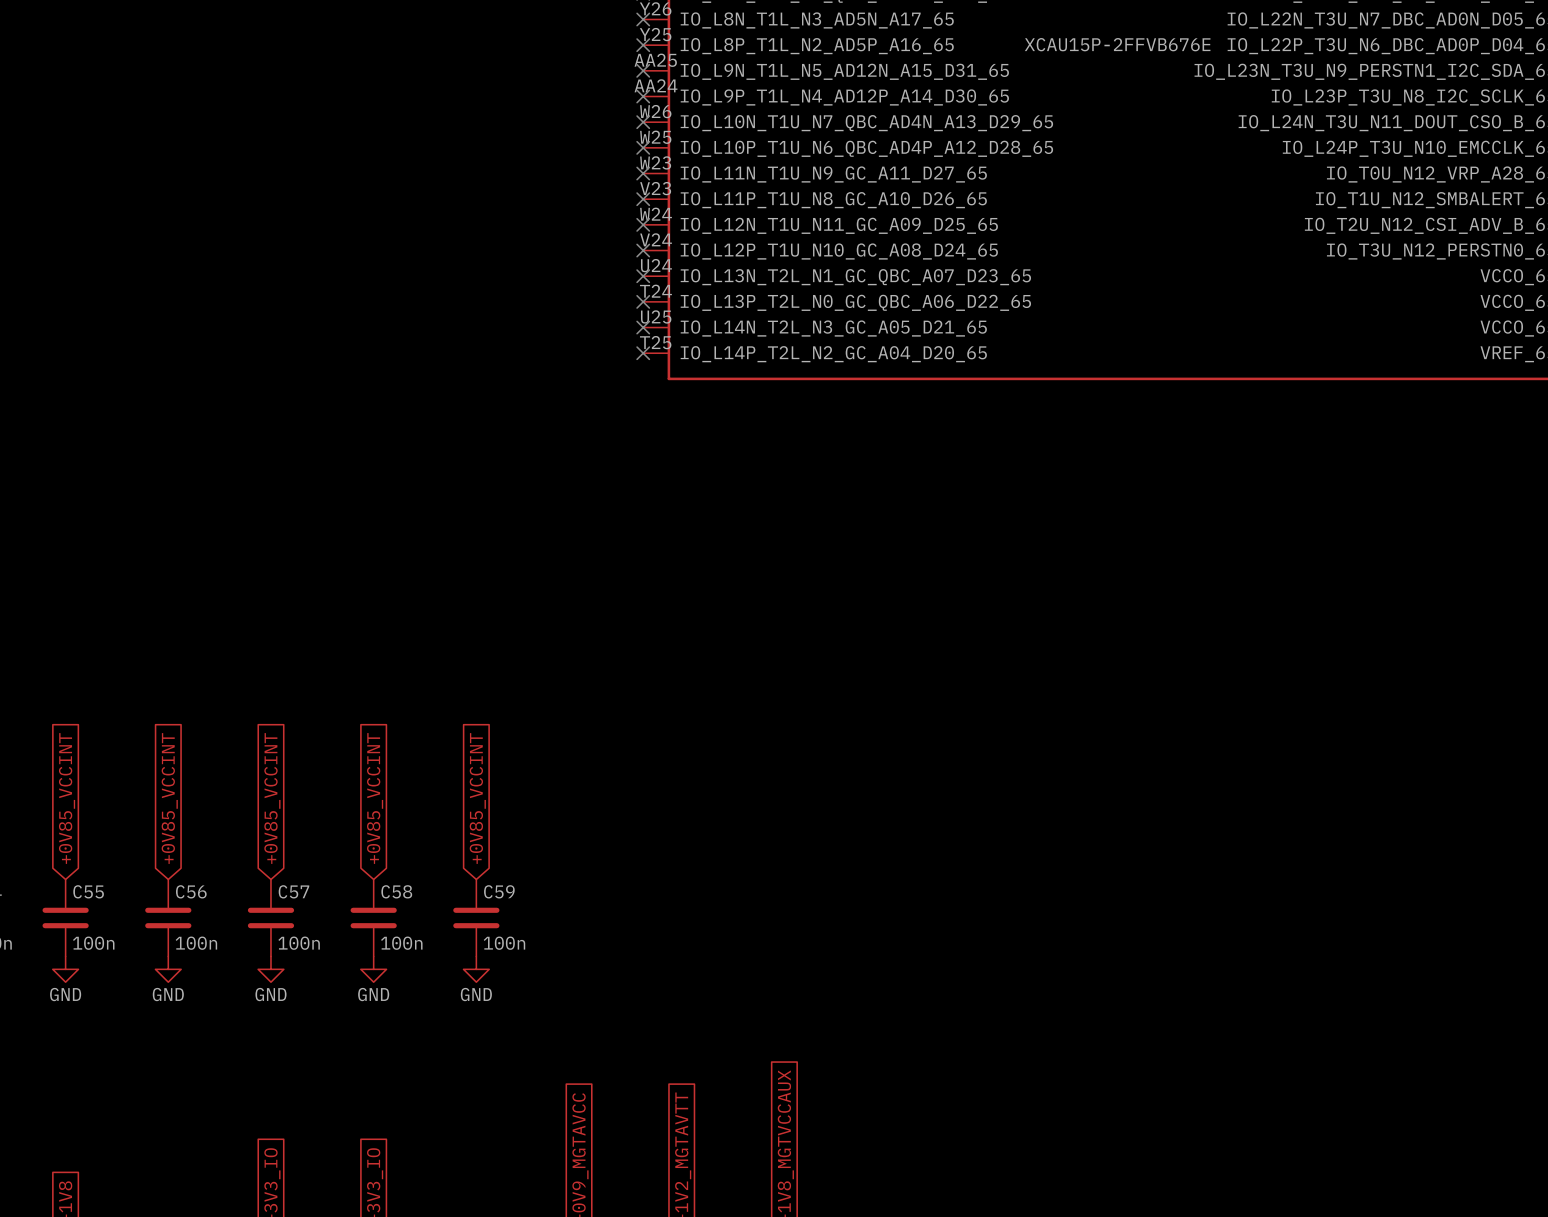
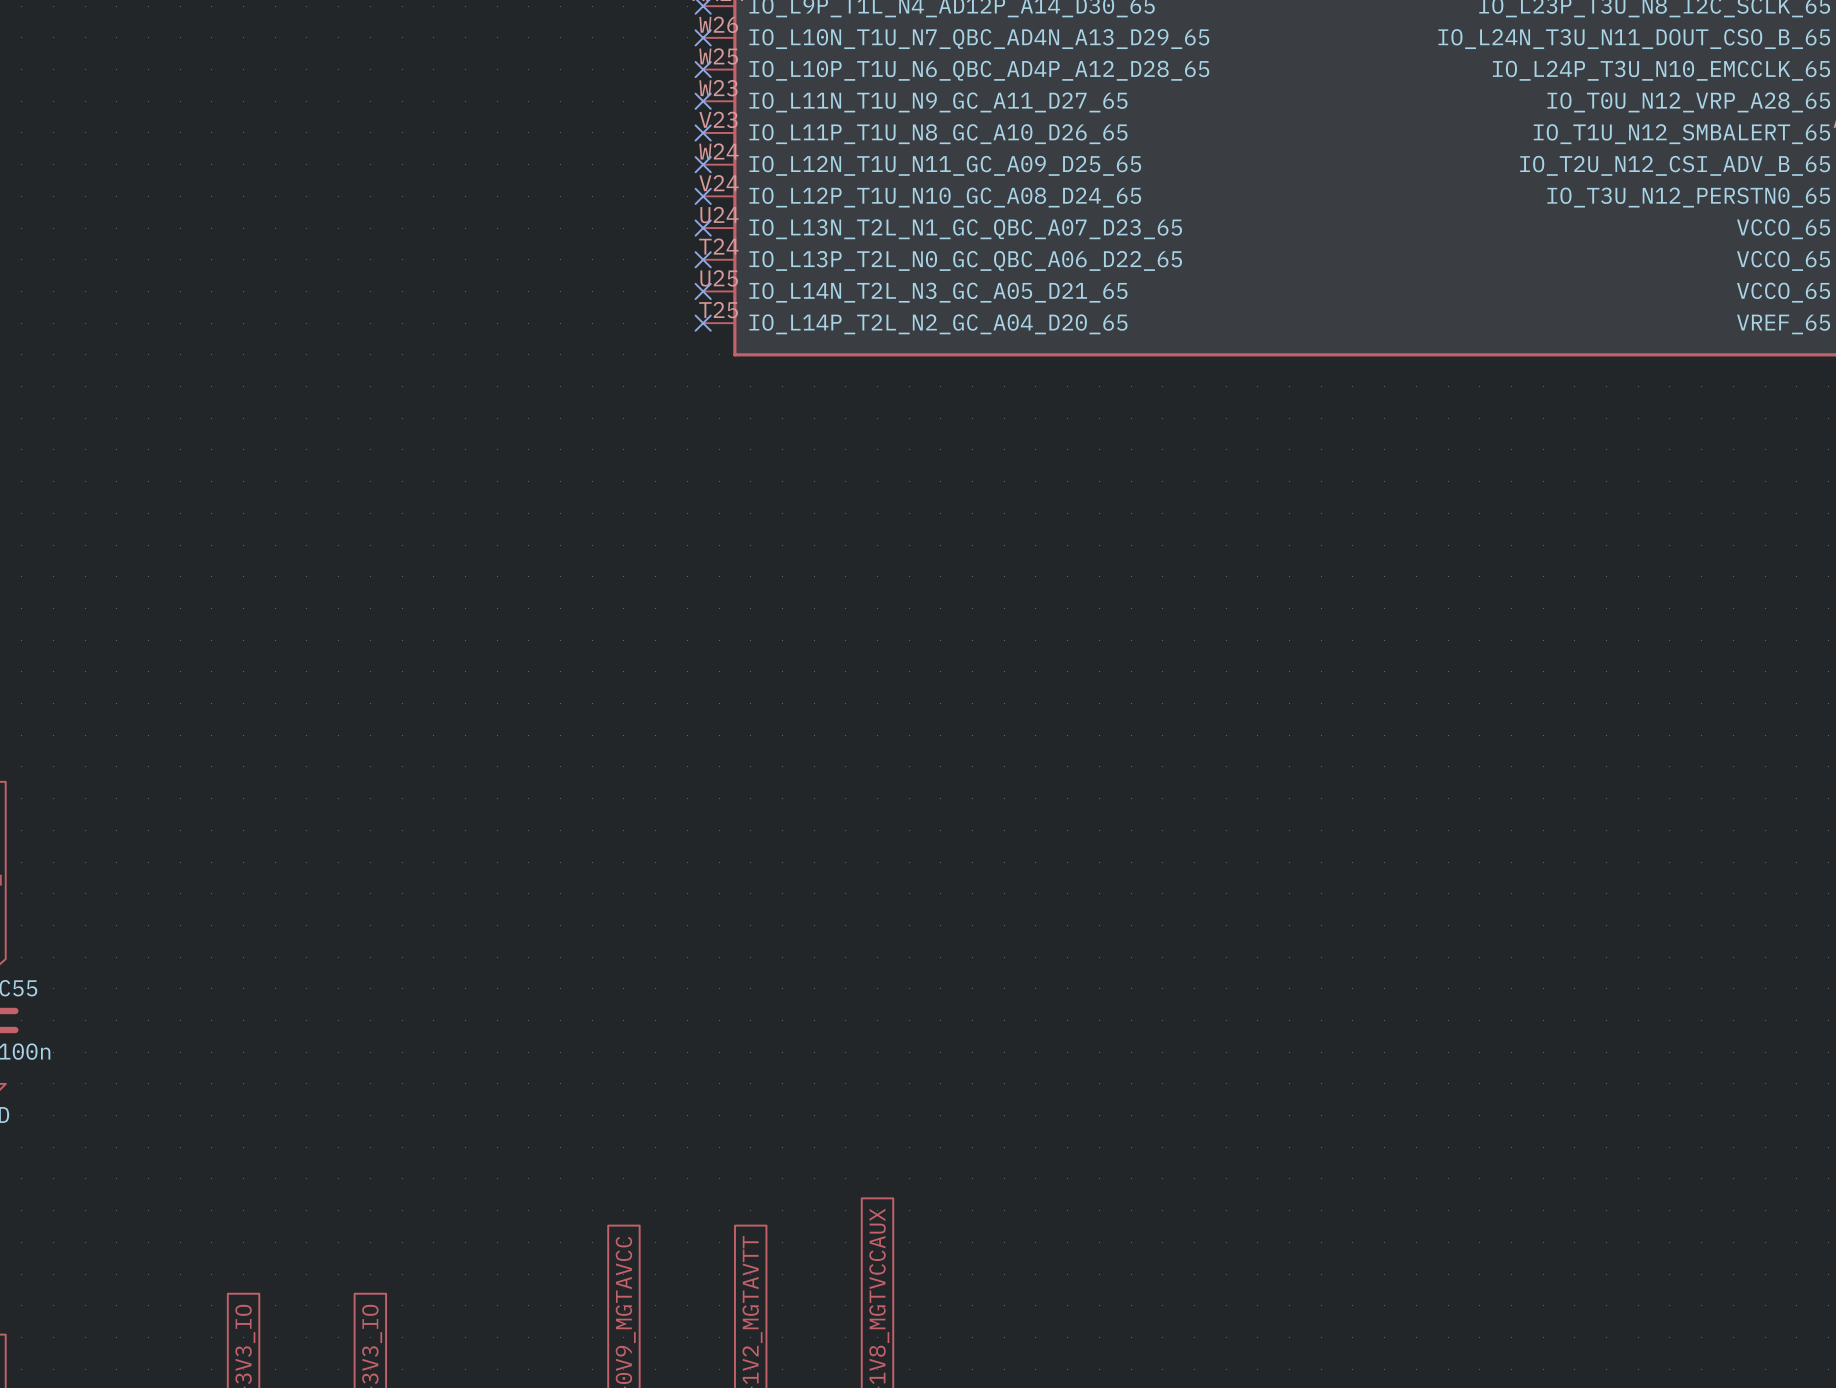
global label: +0V85_VCCINT (169, 798) -> none
global label: +0V85_VCCINT (272, 798) -> none
global label: +0V85_VCCINT (375, 798) -> none
global label: +0V85_VCCINT (477, 798) -> none
C56: 100n (168, 917) -> none
C57: 100n (270, 917) -> none
C58: 100n (373, 917) -> none
C59: 100n (476, 917) -> none
power symbol: GND (168, 969) -> none
power symbol: GND (270, 969) -> none
power symbol: GND (373, 969) -> none
power symbol: GND (476, 969) -> none

